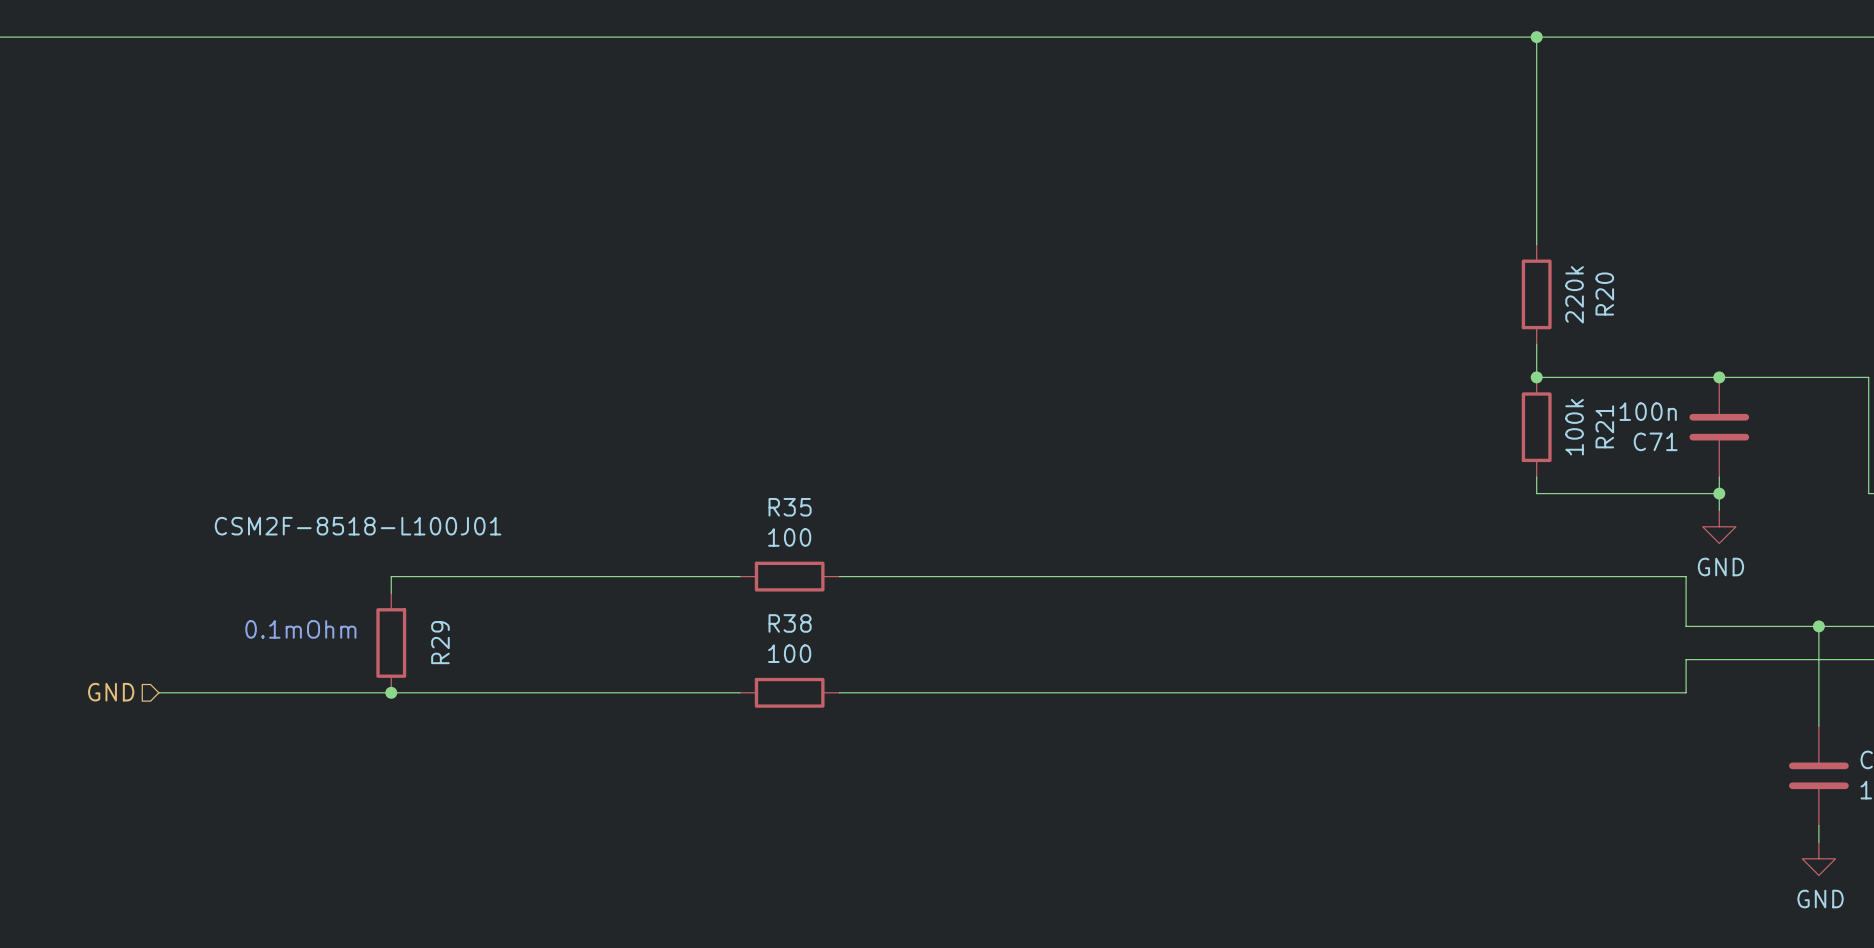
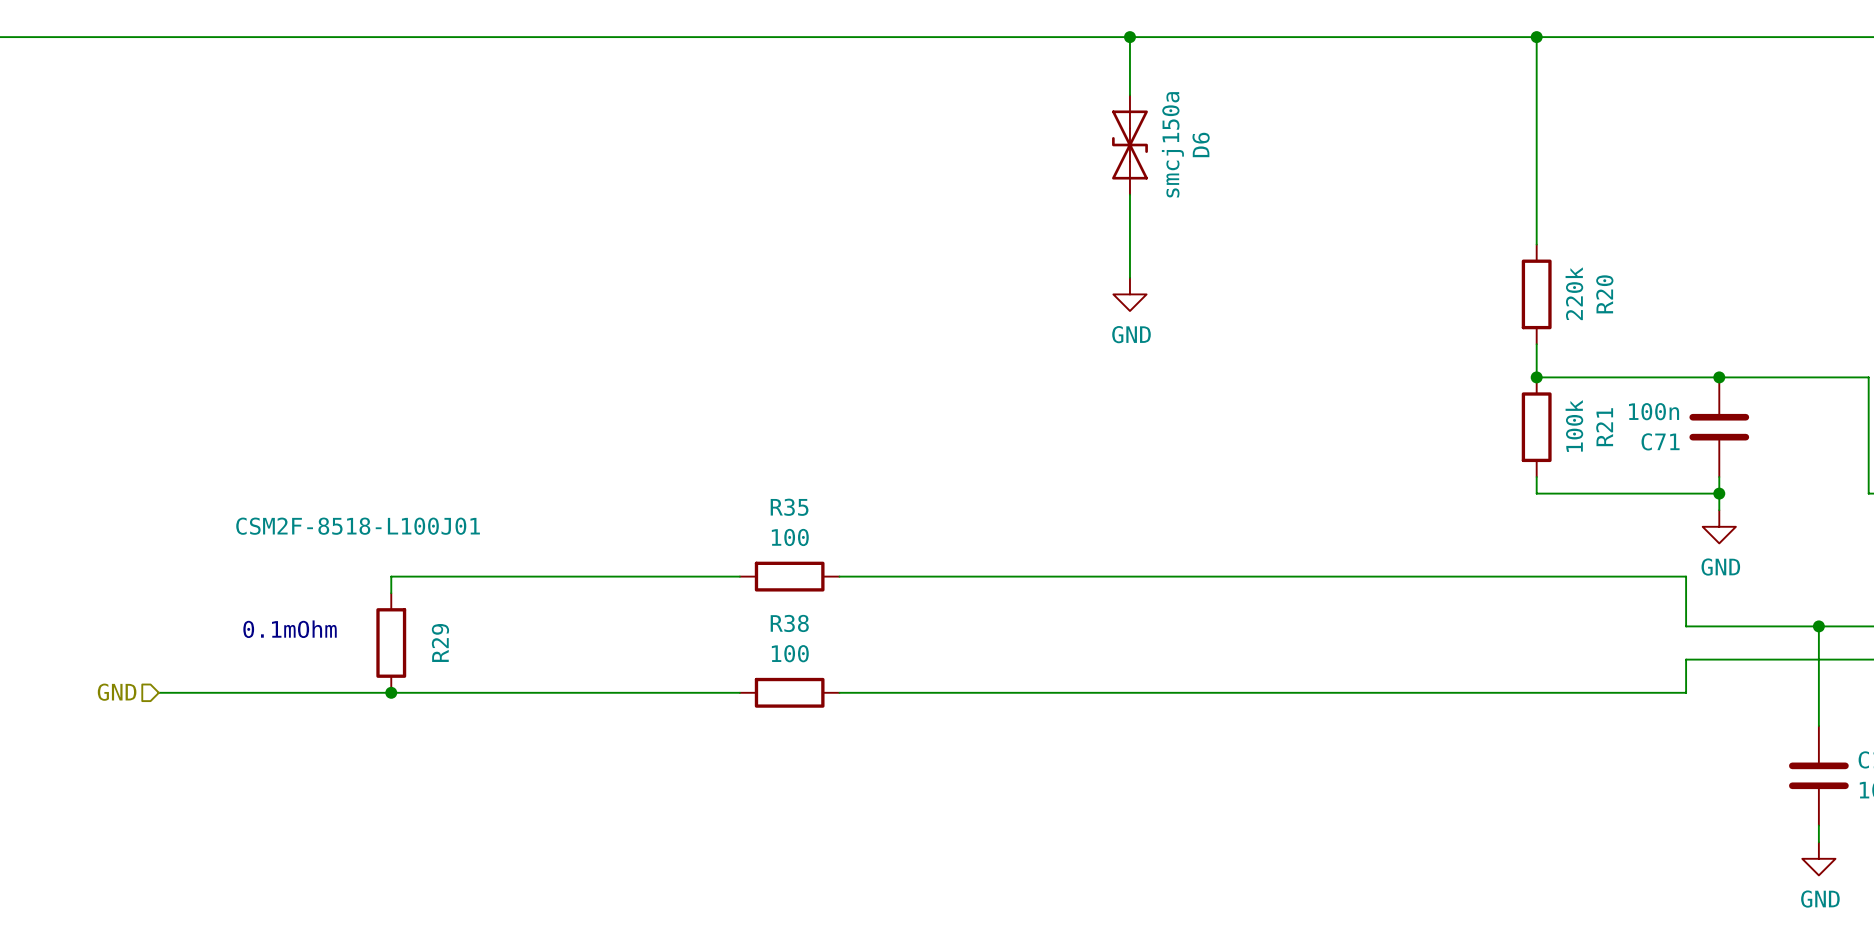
wire: none -> (1129, 37) (1129, 95)
junction: none -> (1129, 37)
D6: none -> smcj150a (1129, 145)
wire: none -> (1129, 194) (1129, 277)
power symbol: none -> GND (1129, 294)

